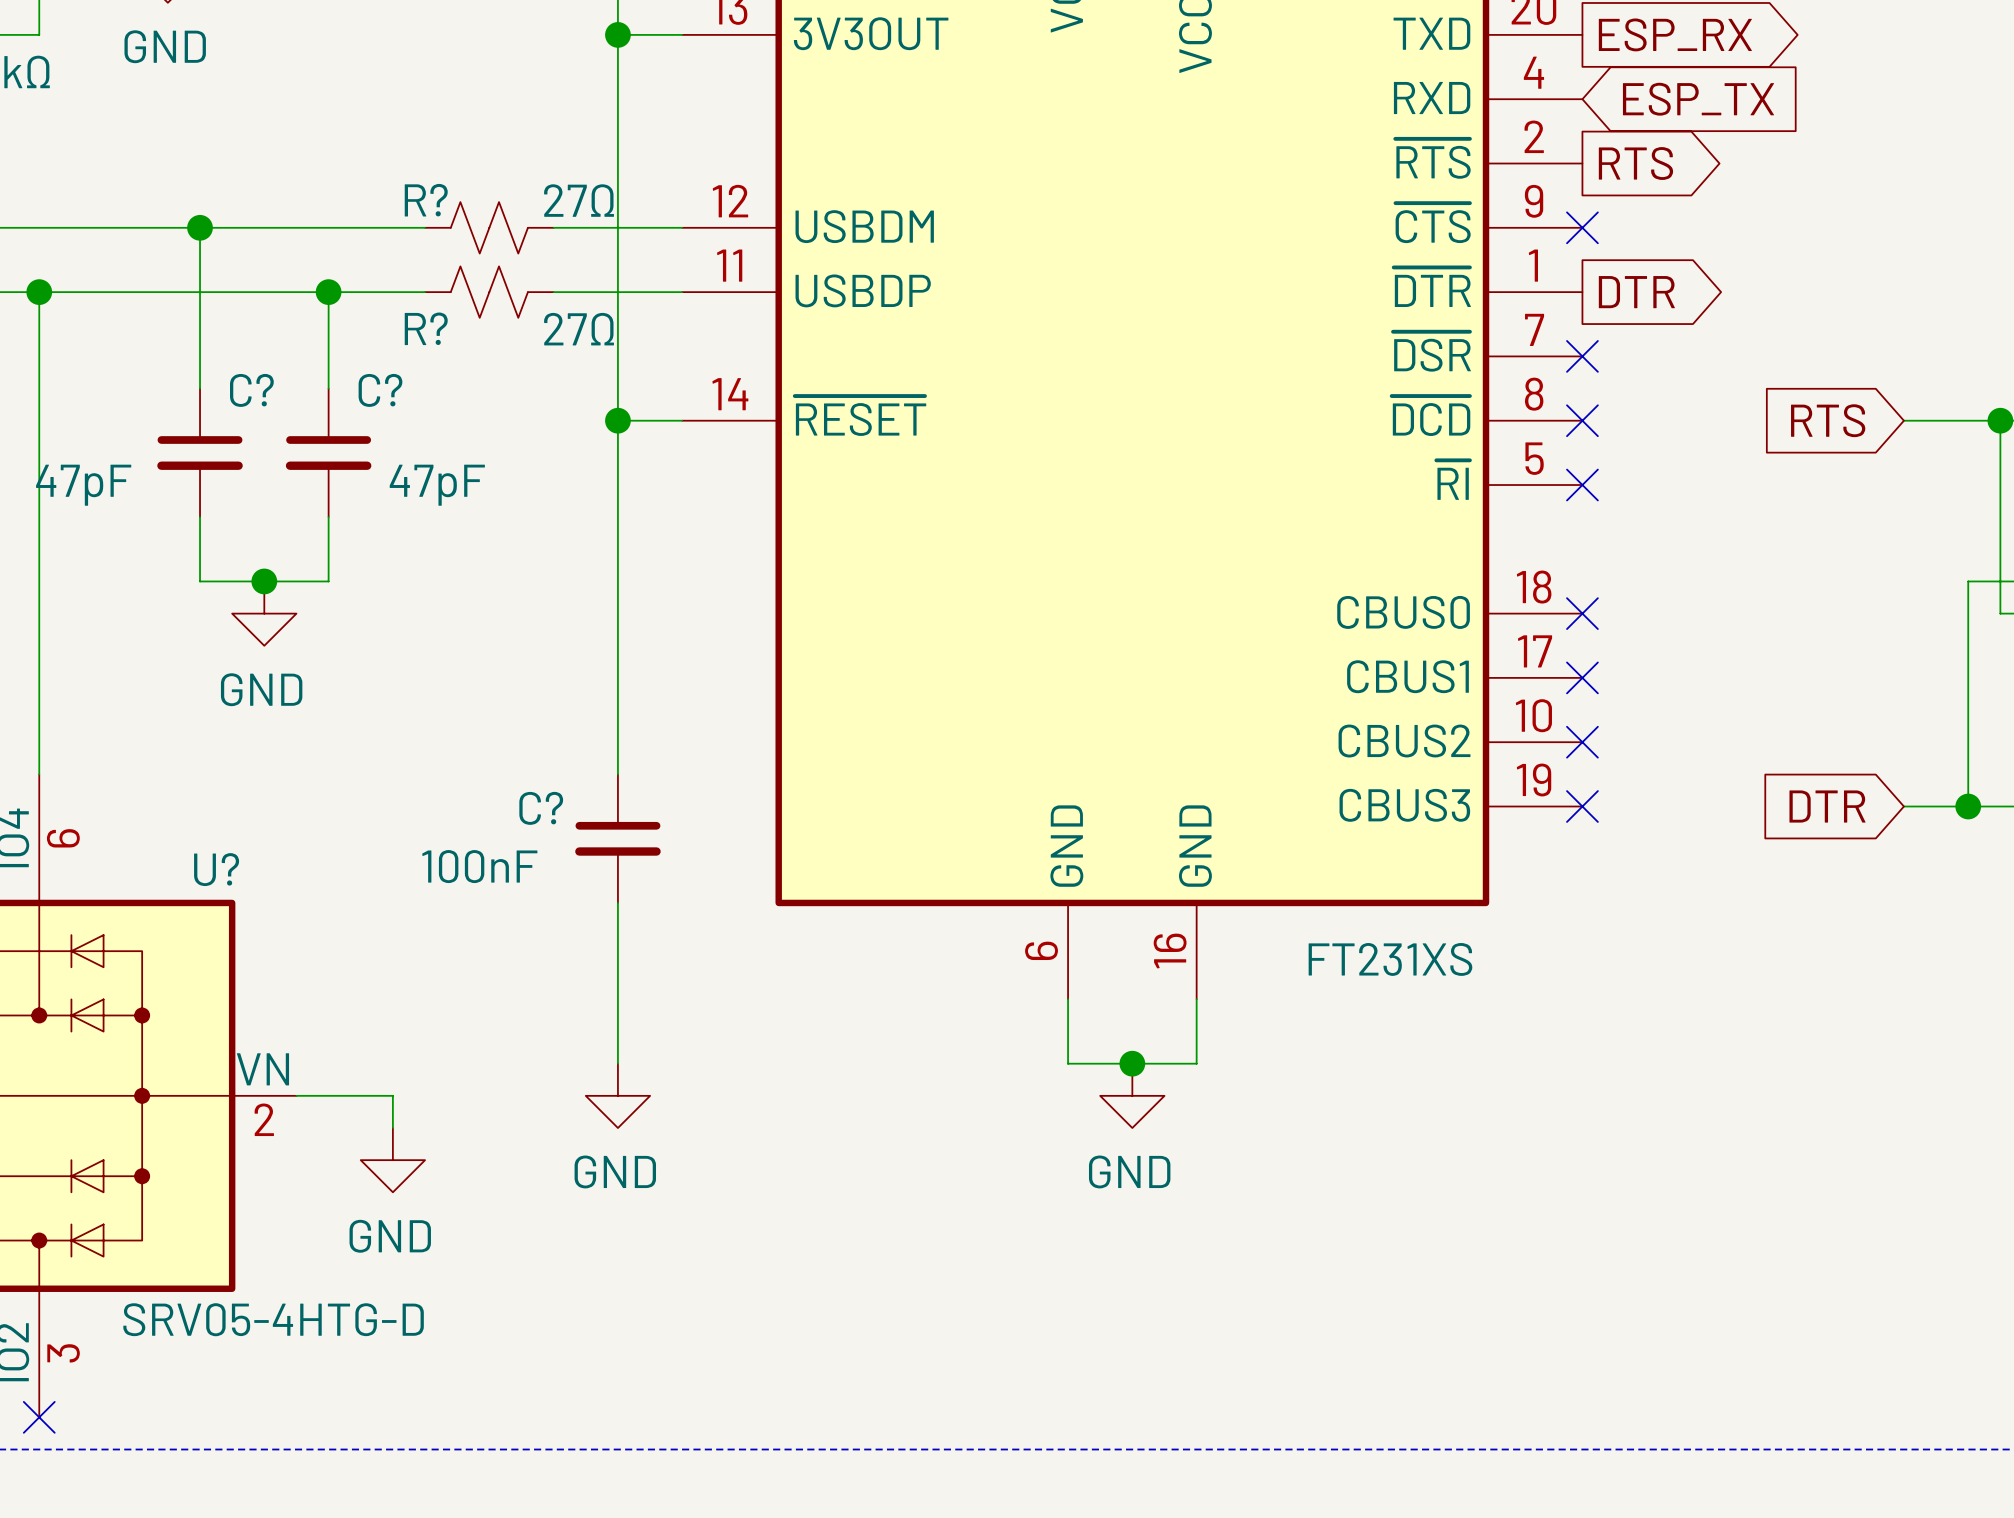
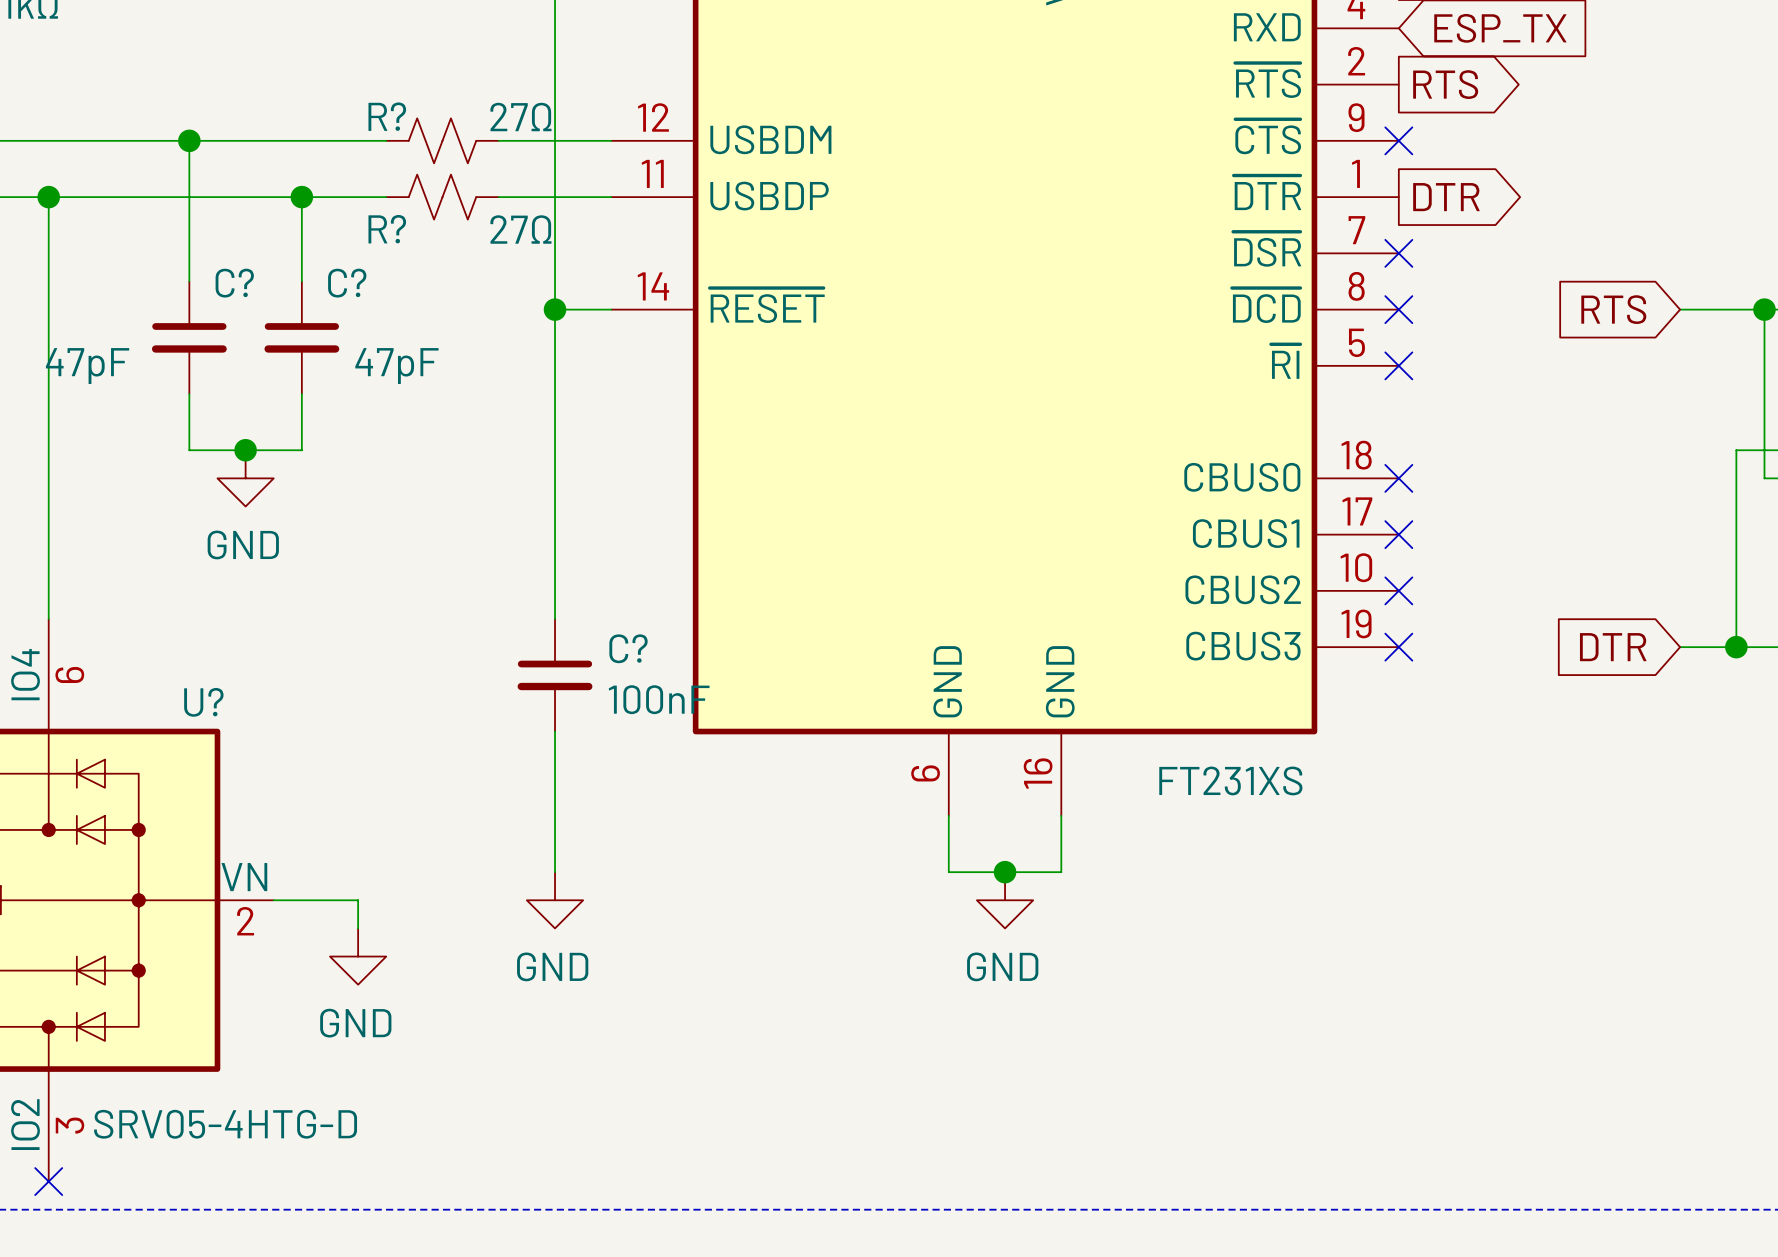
C? name position: C? (541, 808) -> C? (628, 648)
C? value position: 100nF (479, 866) -> 100nF (659, 699)
U? value position: SRV05-4HTG-D (273, 1319) -> SRV05-4HTG-D (225, 1124)

